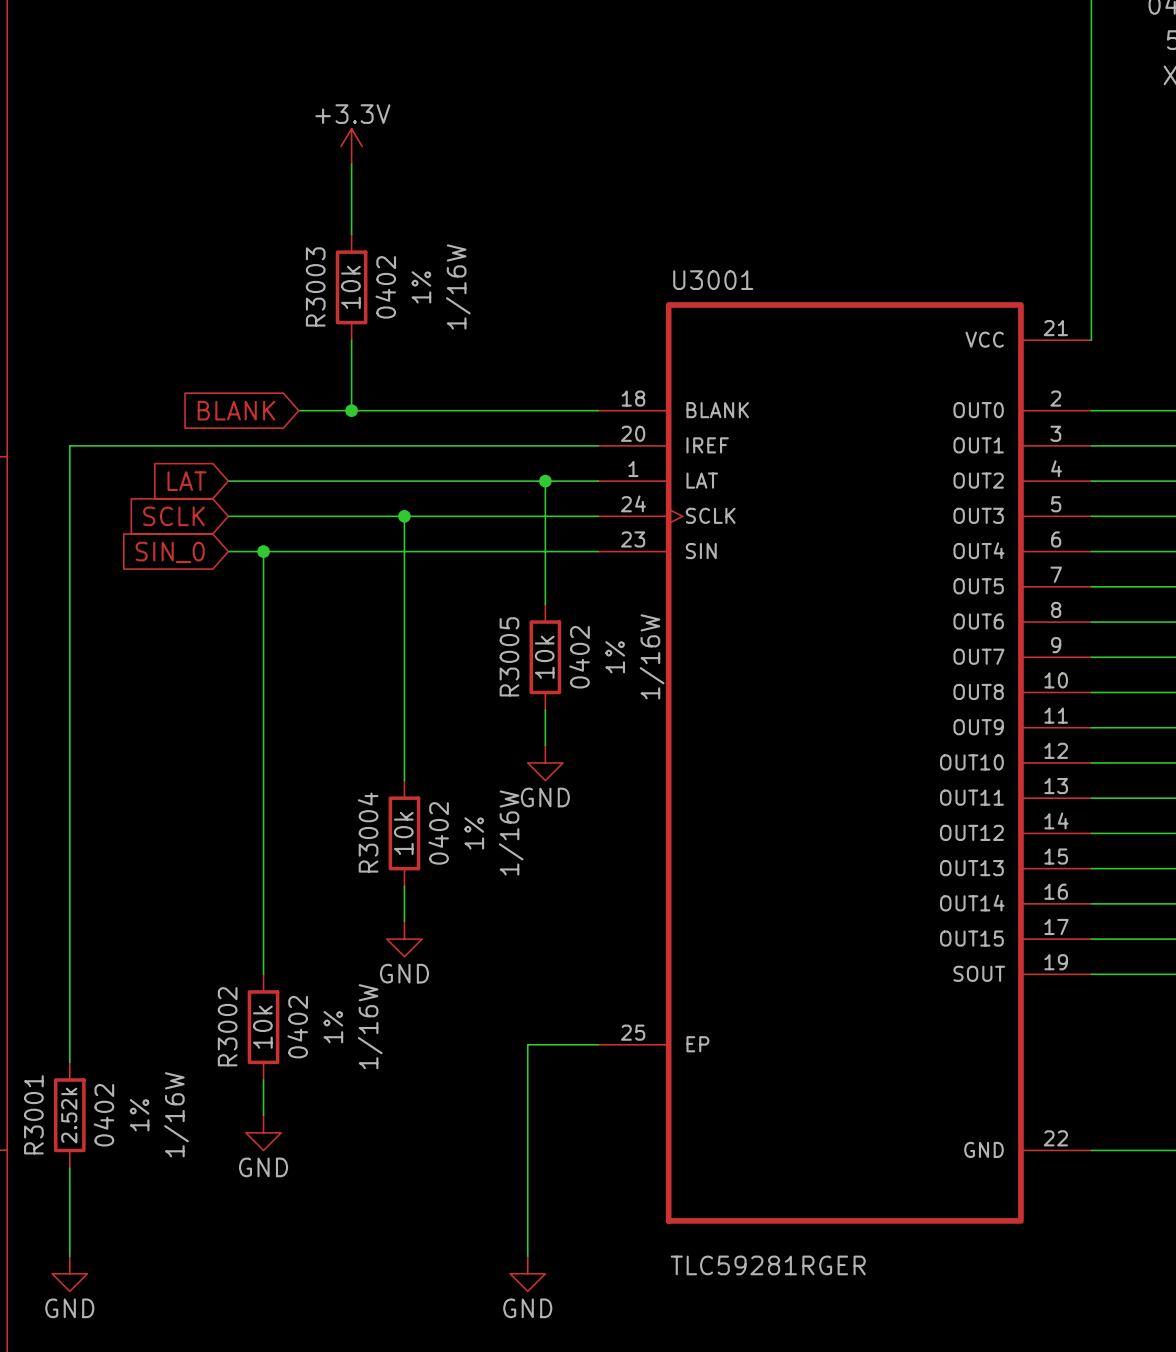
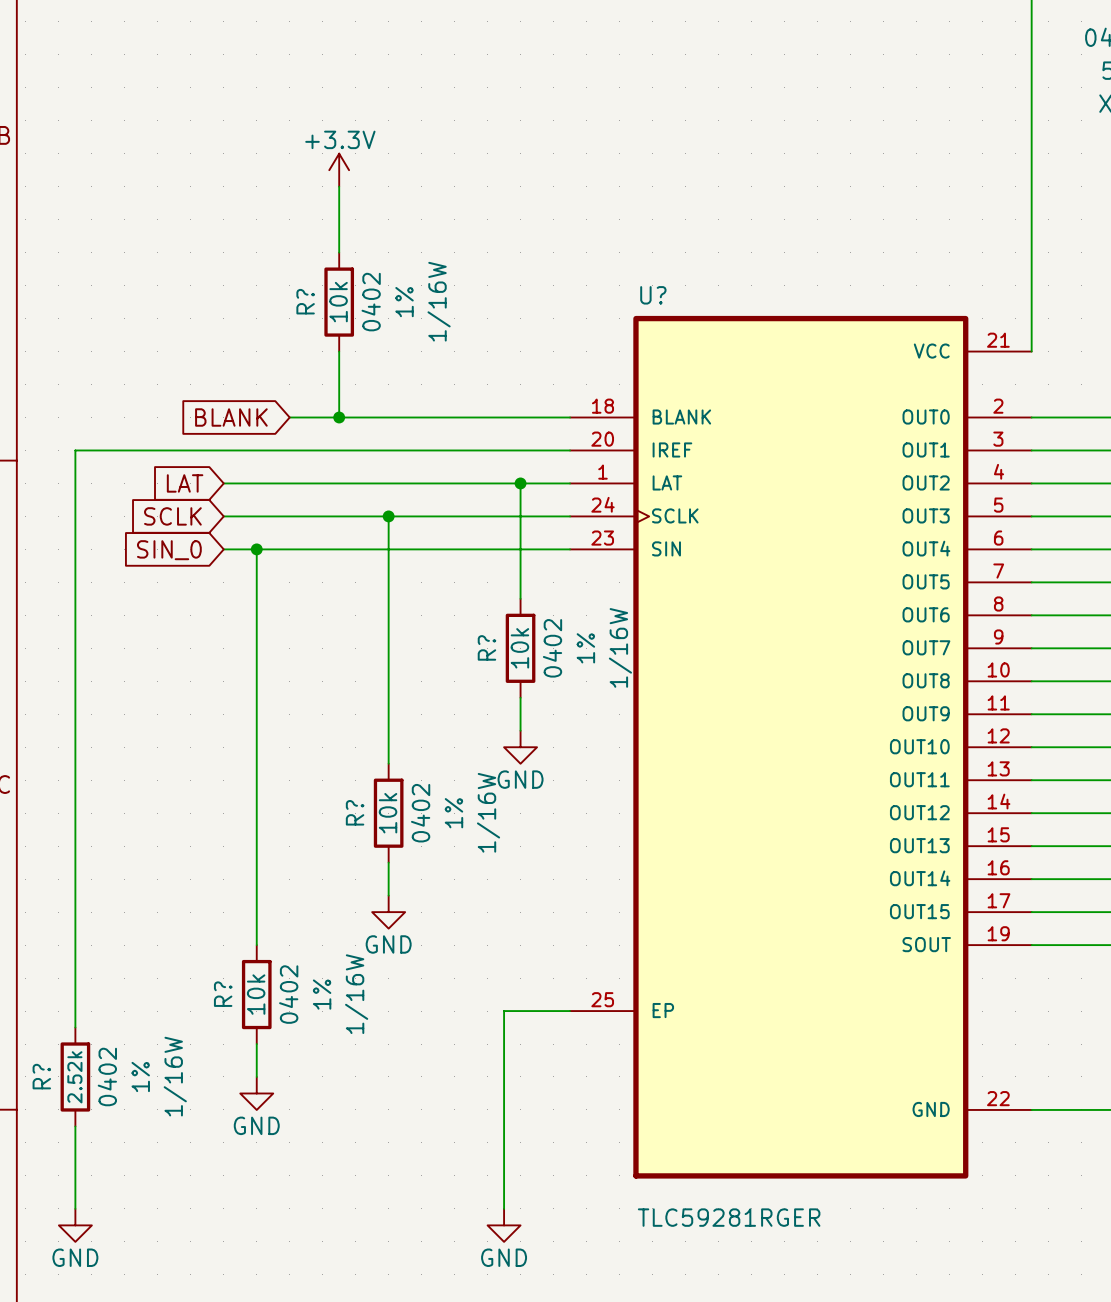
U3001 name: U3001 (713, 280) -> U? (653, 295)
R3003 name: R3003 (315, 286) -> R? (305, 301)
R3005 name: R3005 (509, 656) -> R? (486, 647)
R3004 name: R3004 (368, 832) -> R? (355, 812)
R3002 name: R3002 (227, 1026) -> R? (223, 994)
R3001 name: R3001 (33, 1114) -> R? (41, 1076)

